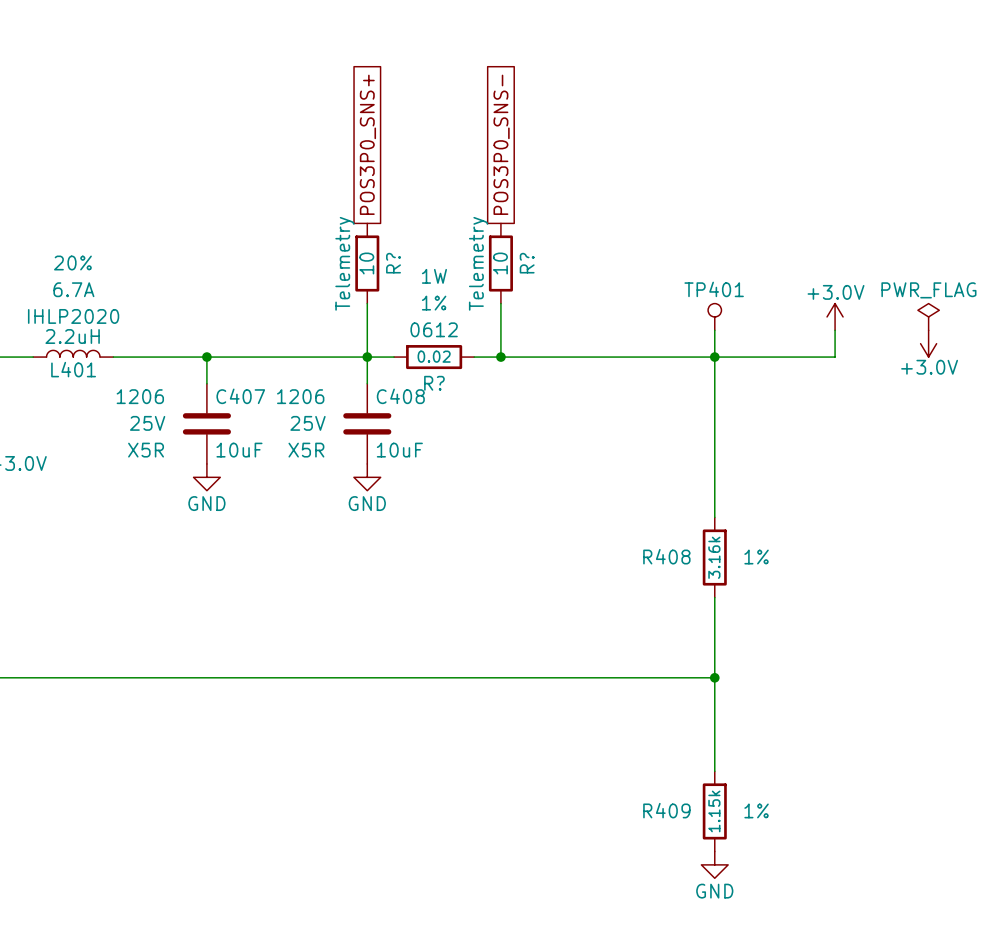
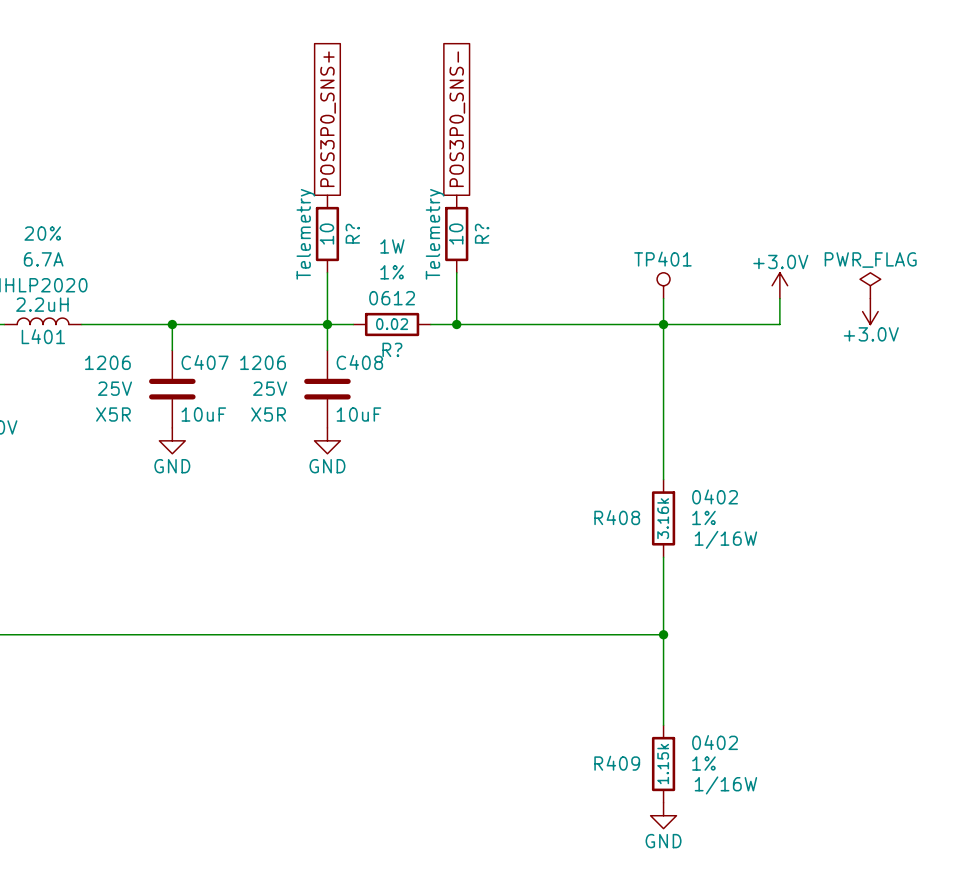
R408 text: none -> 0402 (715, 496)
R408 text: none -> 1/16W (725, 539)
R409 text: none -> 0402 (715, 742)
R409 text: none -> 1/16W (725, 785)

